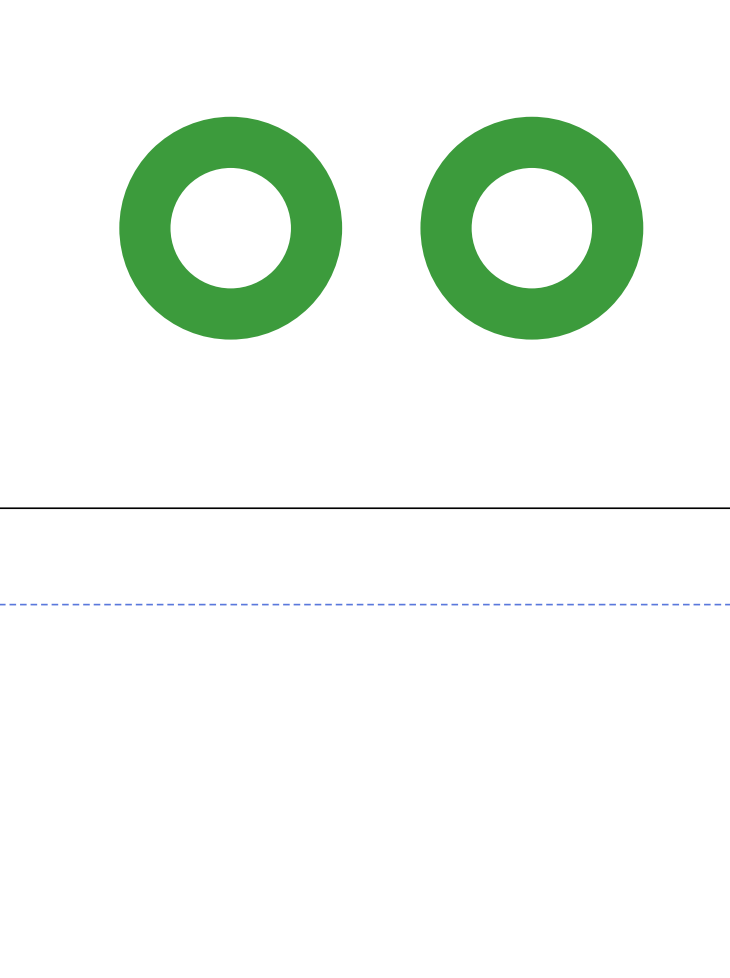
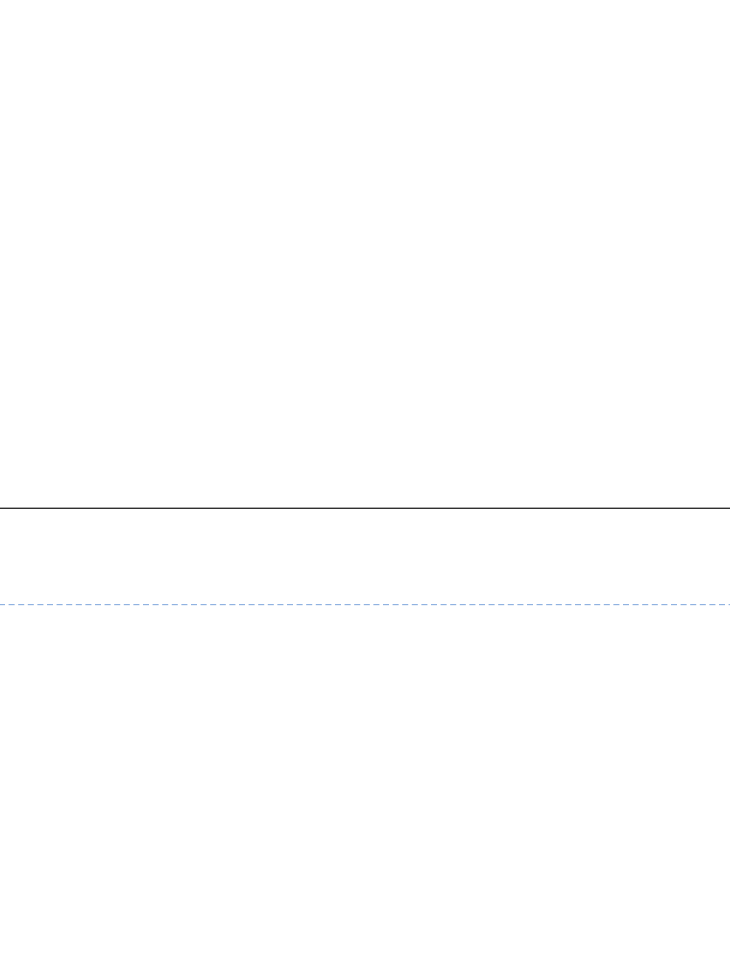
part: (381, 228) -> none

